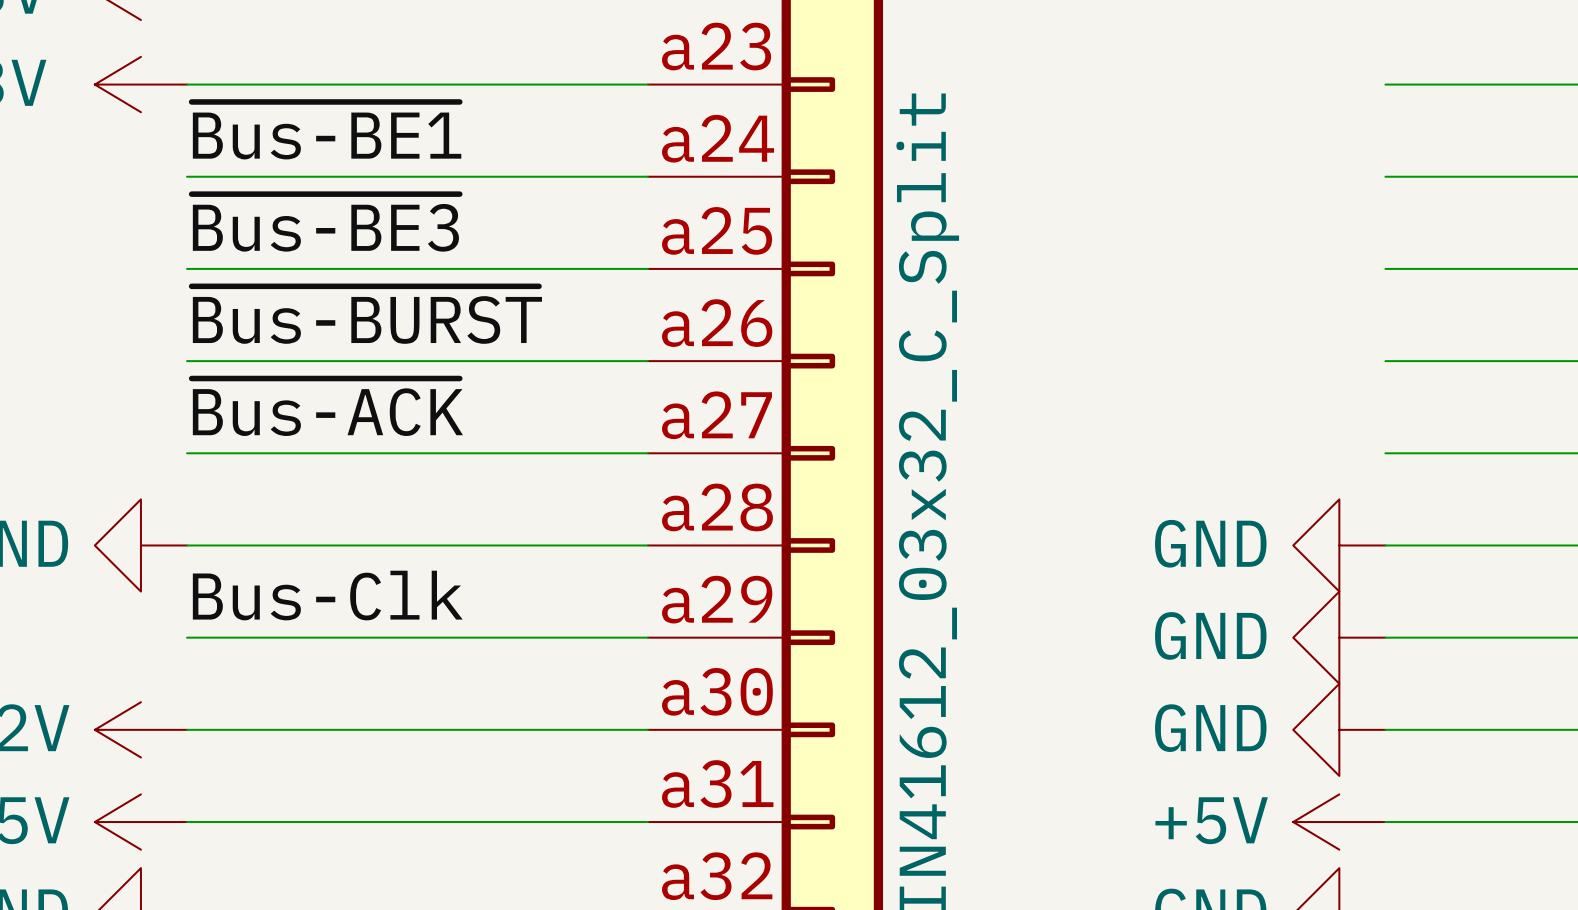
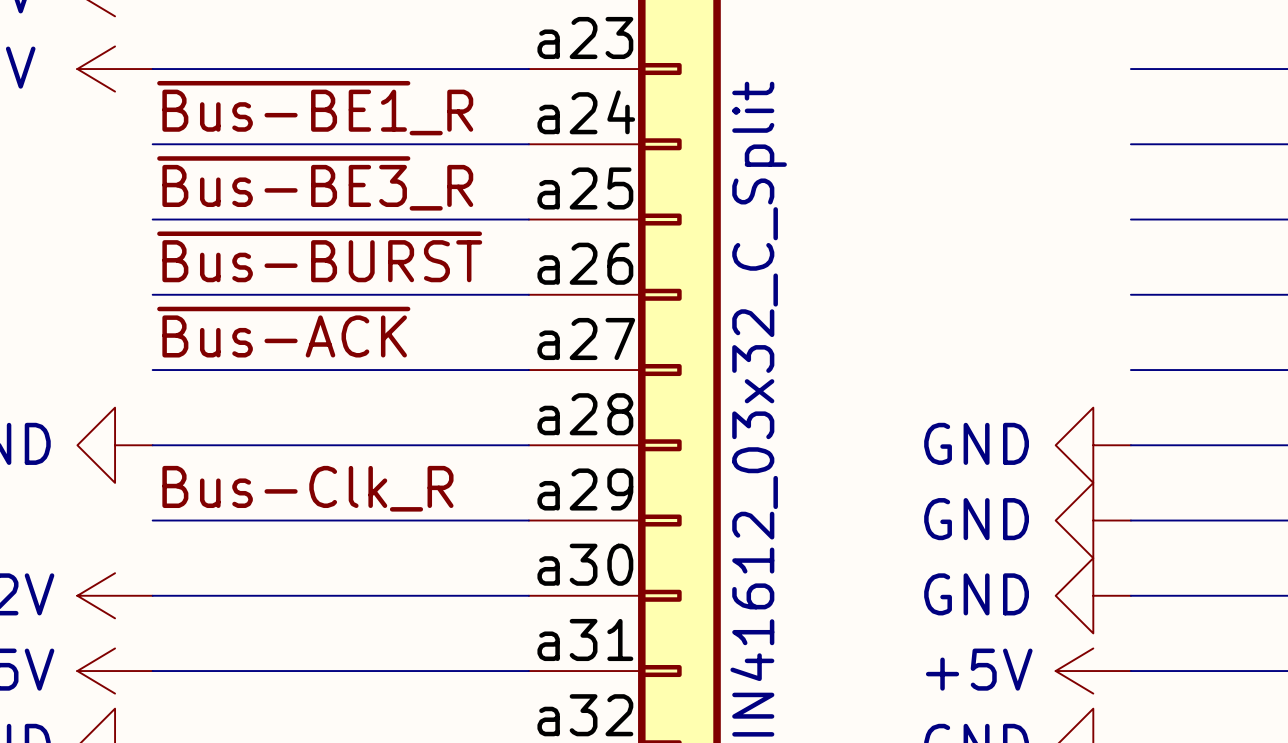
label: ~{Bus-BE1} (326, 130) -> ~{Bus-BE1}_R (315, 108)
label: ~{Bus-BE3} (325, 222) -> ~{Bus-BE3}_R (315, 183)
label: Bus-Clk (327, 595) -> Bus-Clk_R (307, 488)

